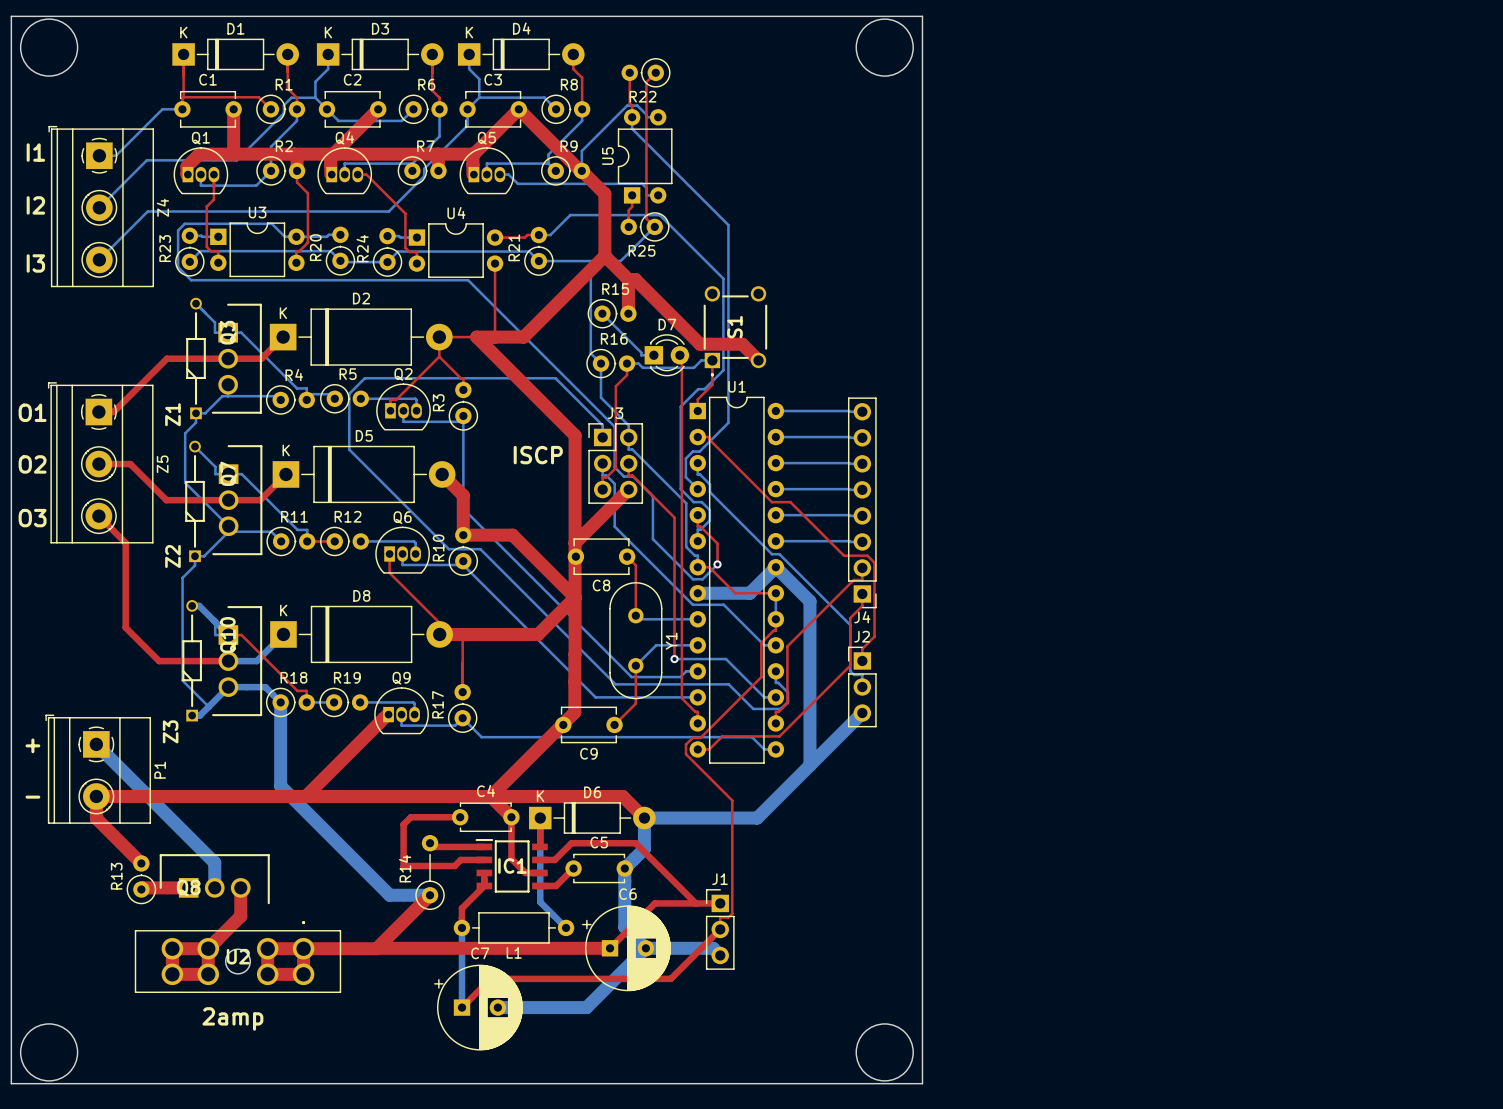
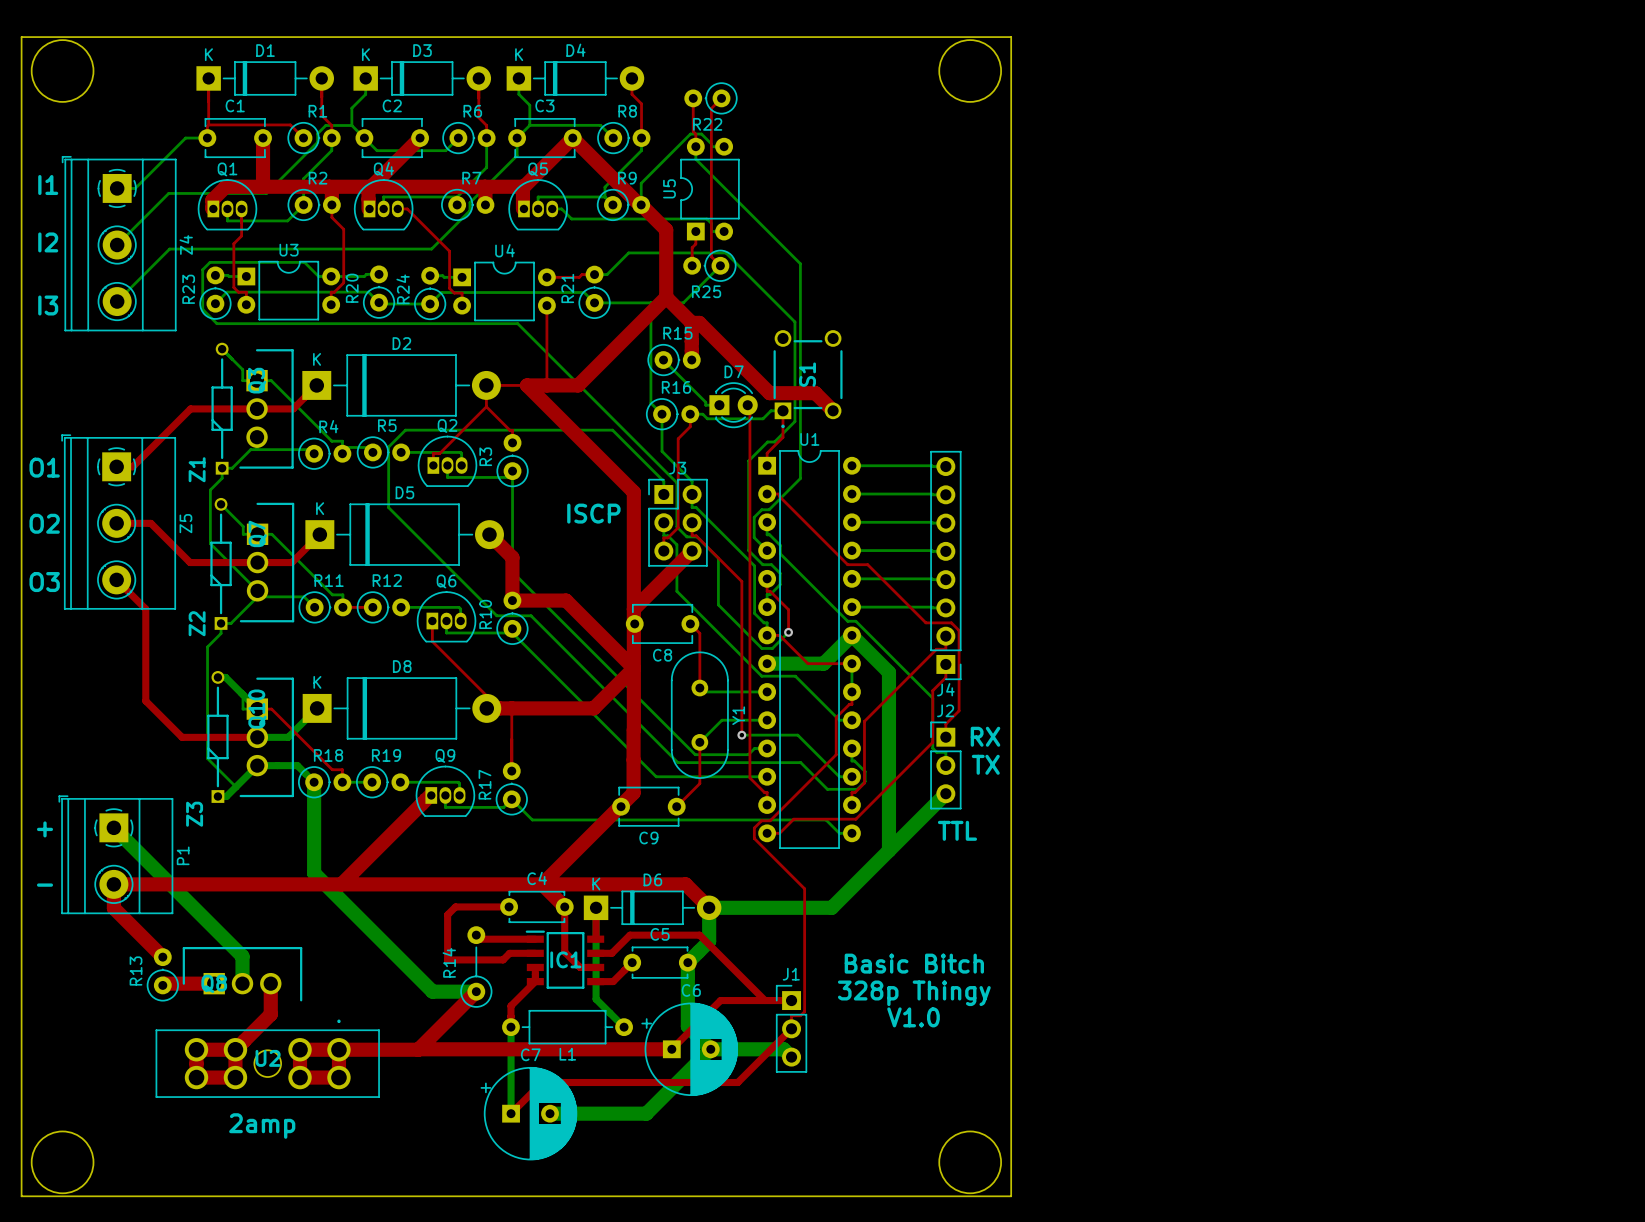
text: none -> RX (985, 736)
text: none -> TX (985, 764)
text: none -> TTL (957, 830)
text: none -> Basic Bitch (914, 963)
text: none -> 328p Thingy (914, 993)
text: none -> V1.0 (913, 1017)

